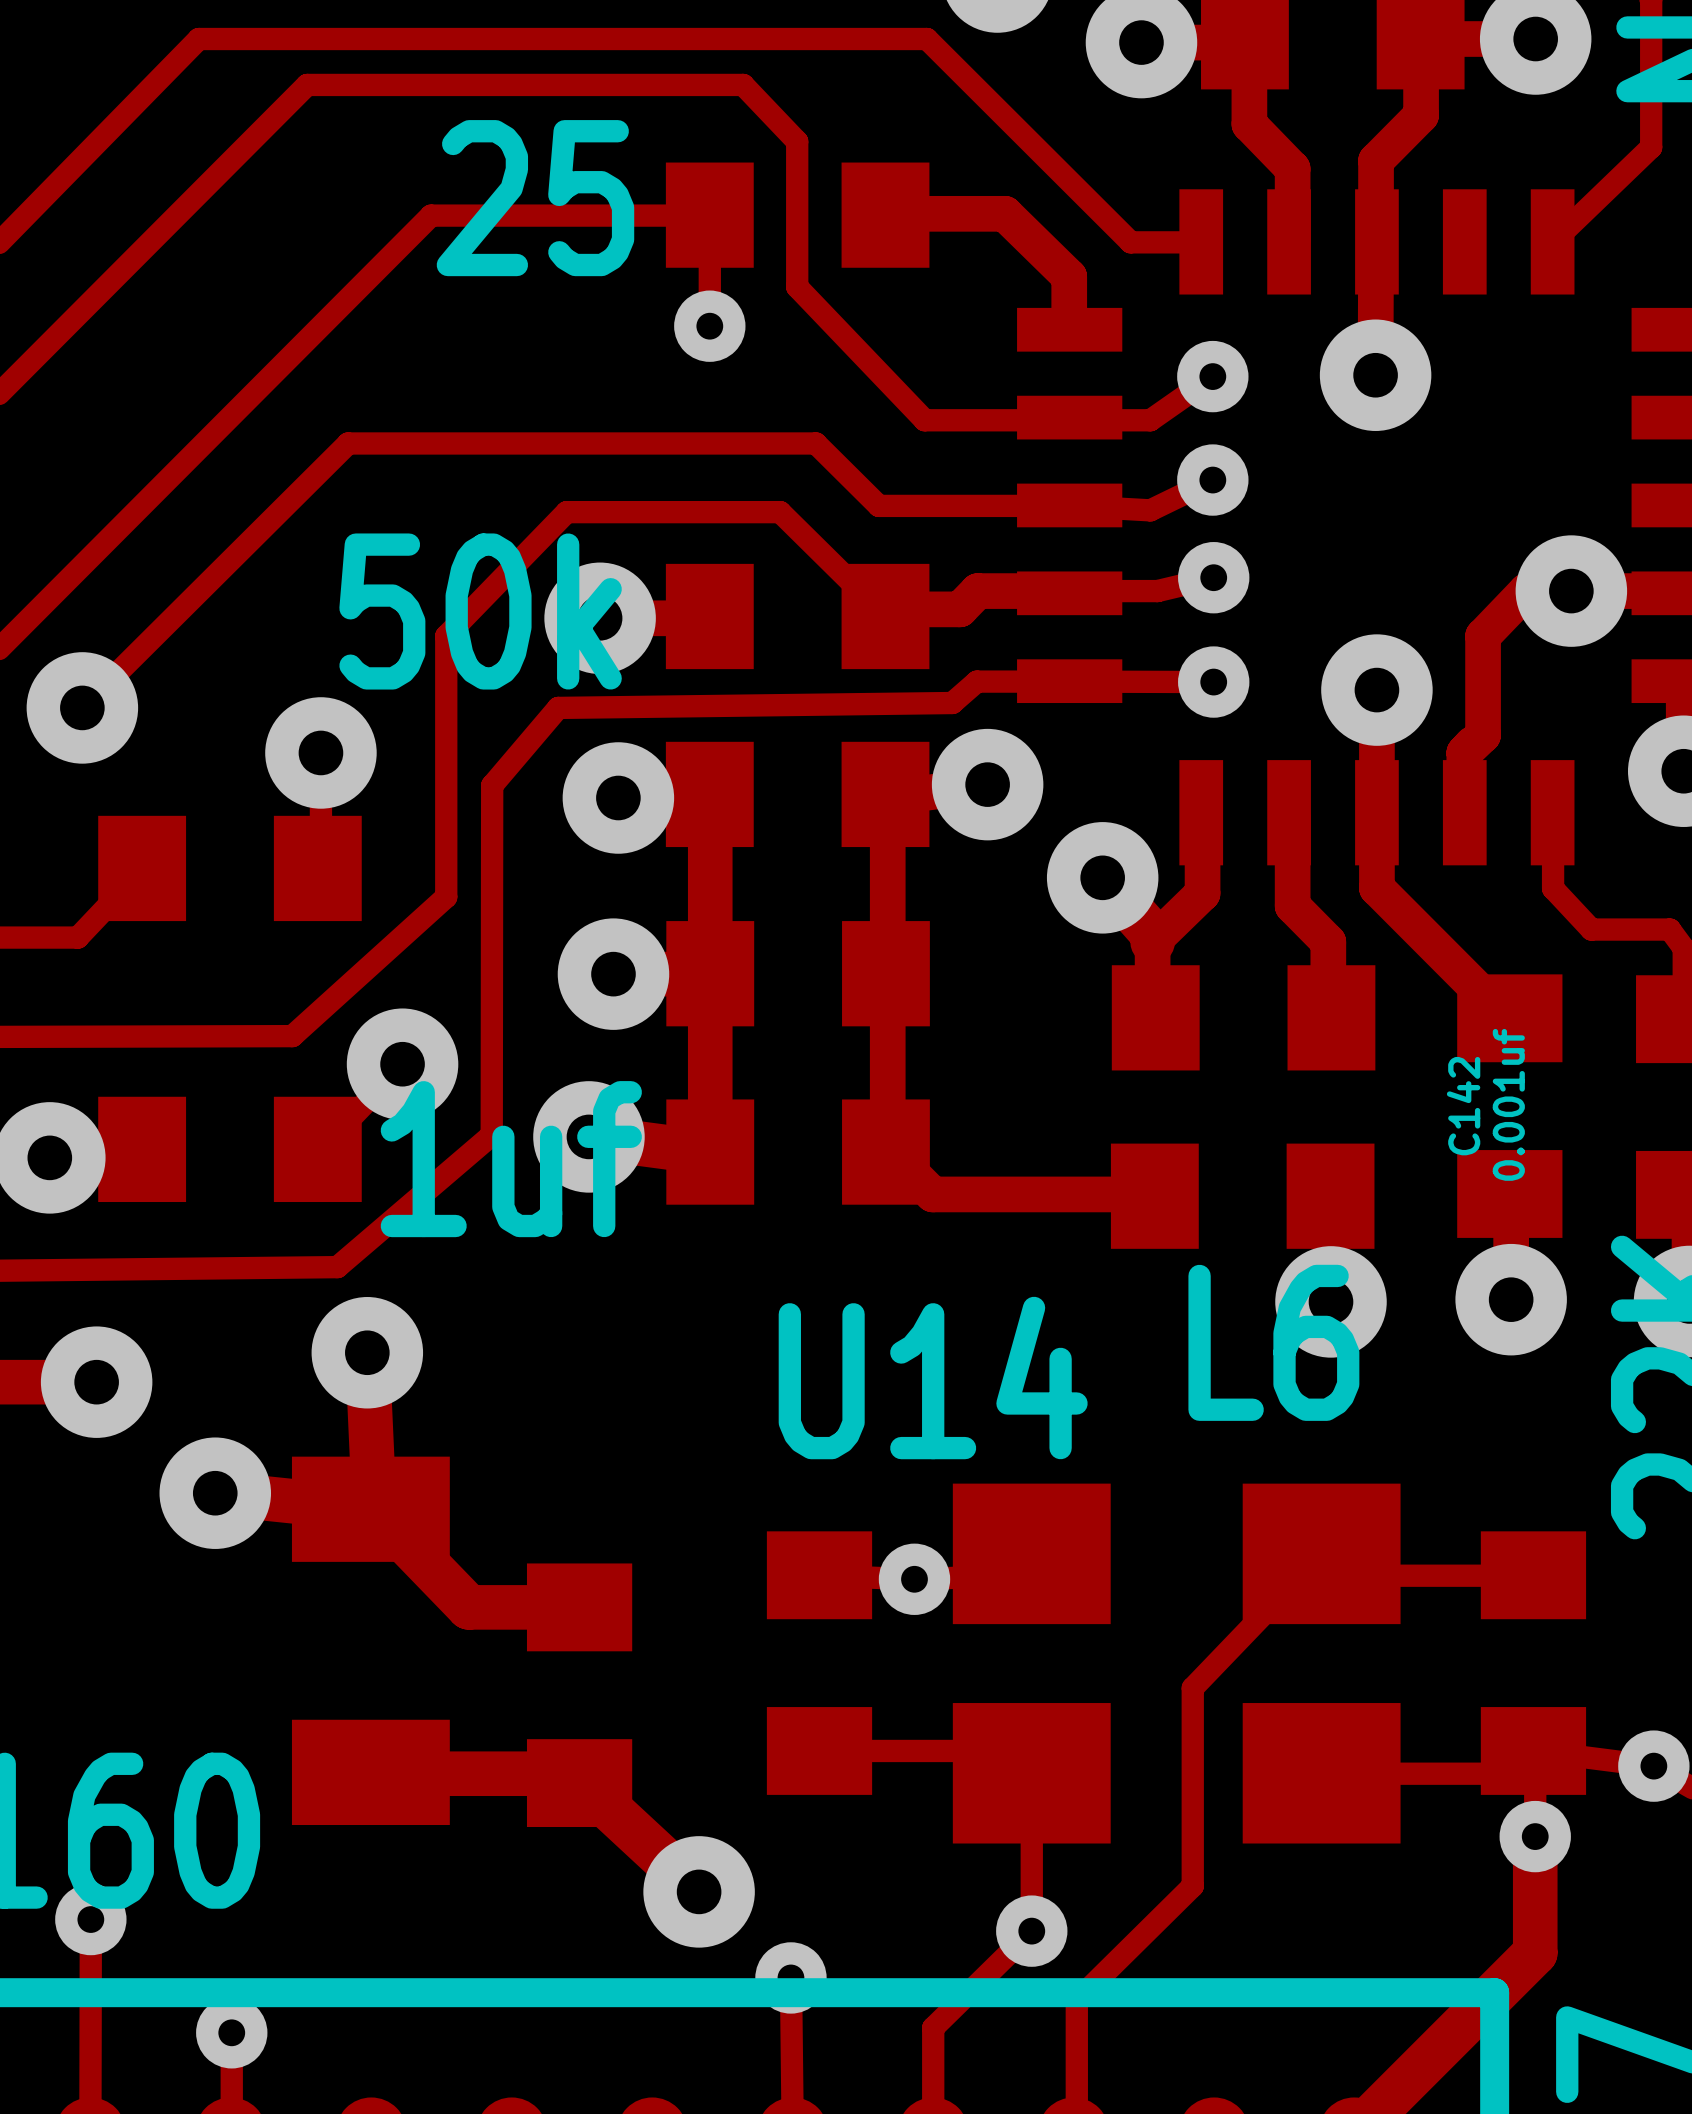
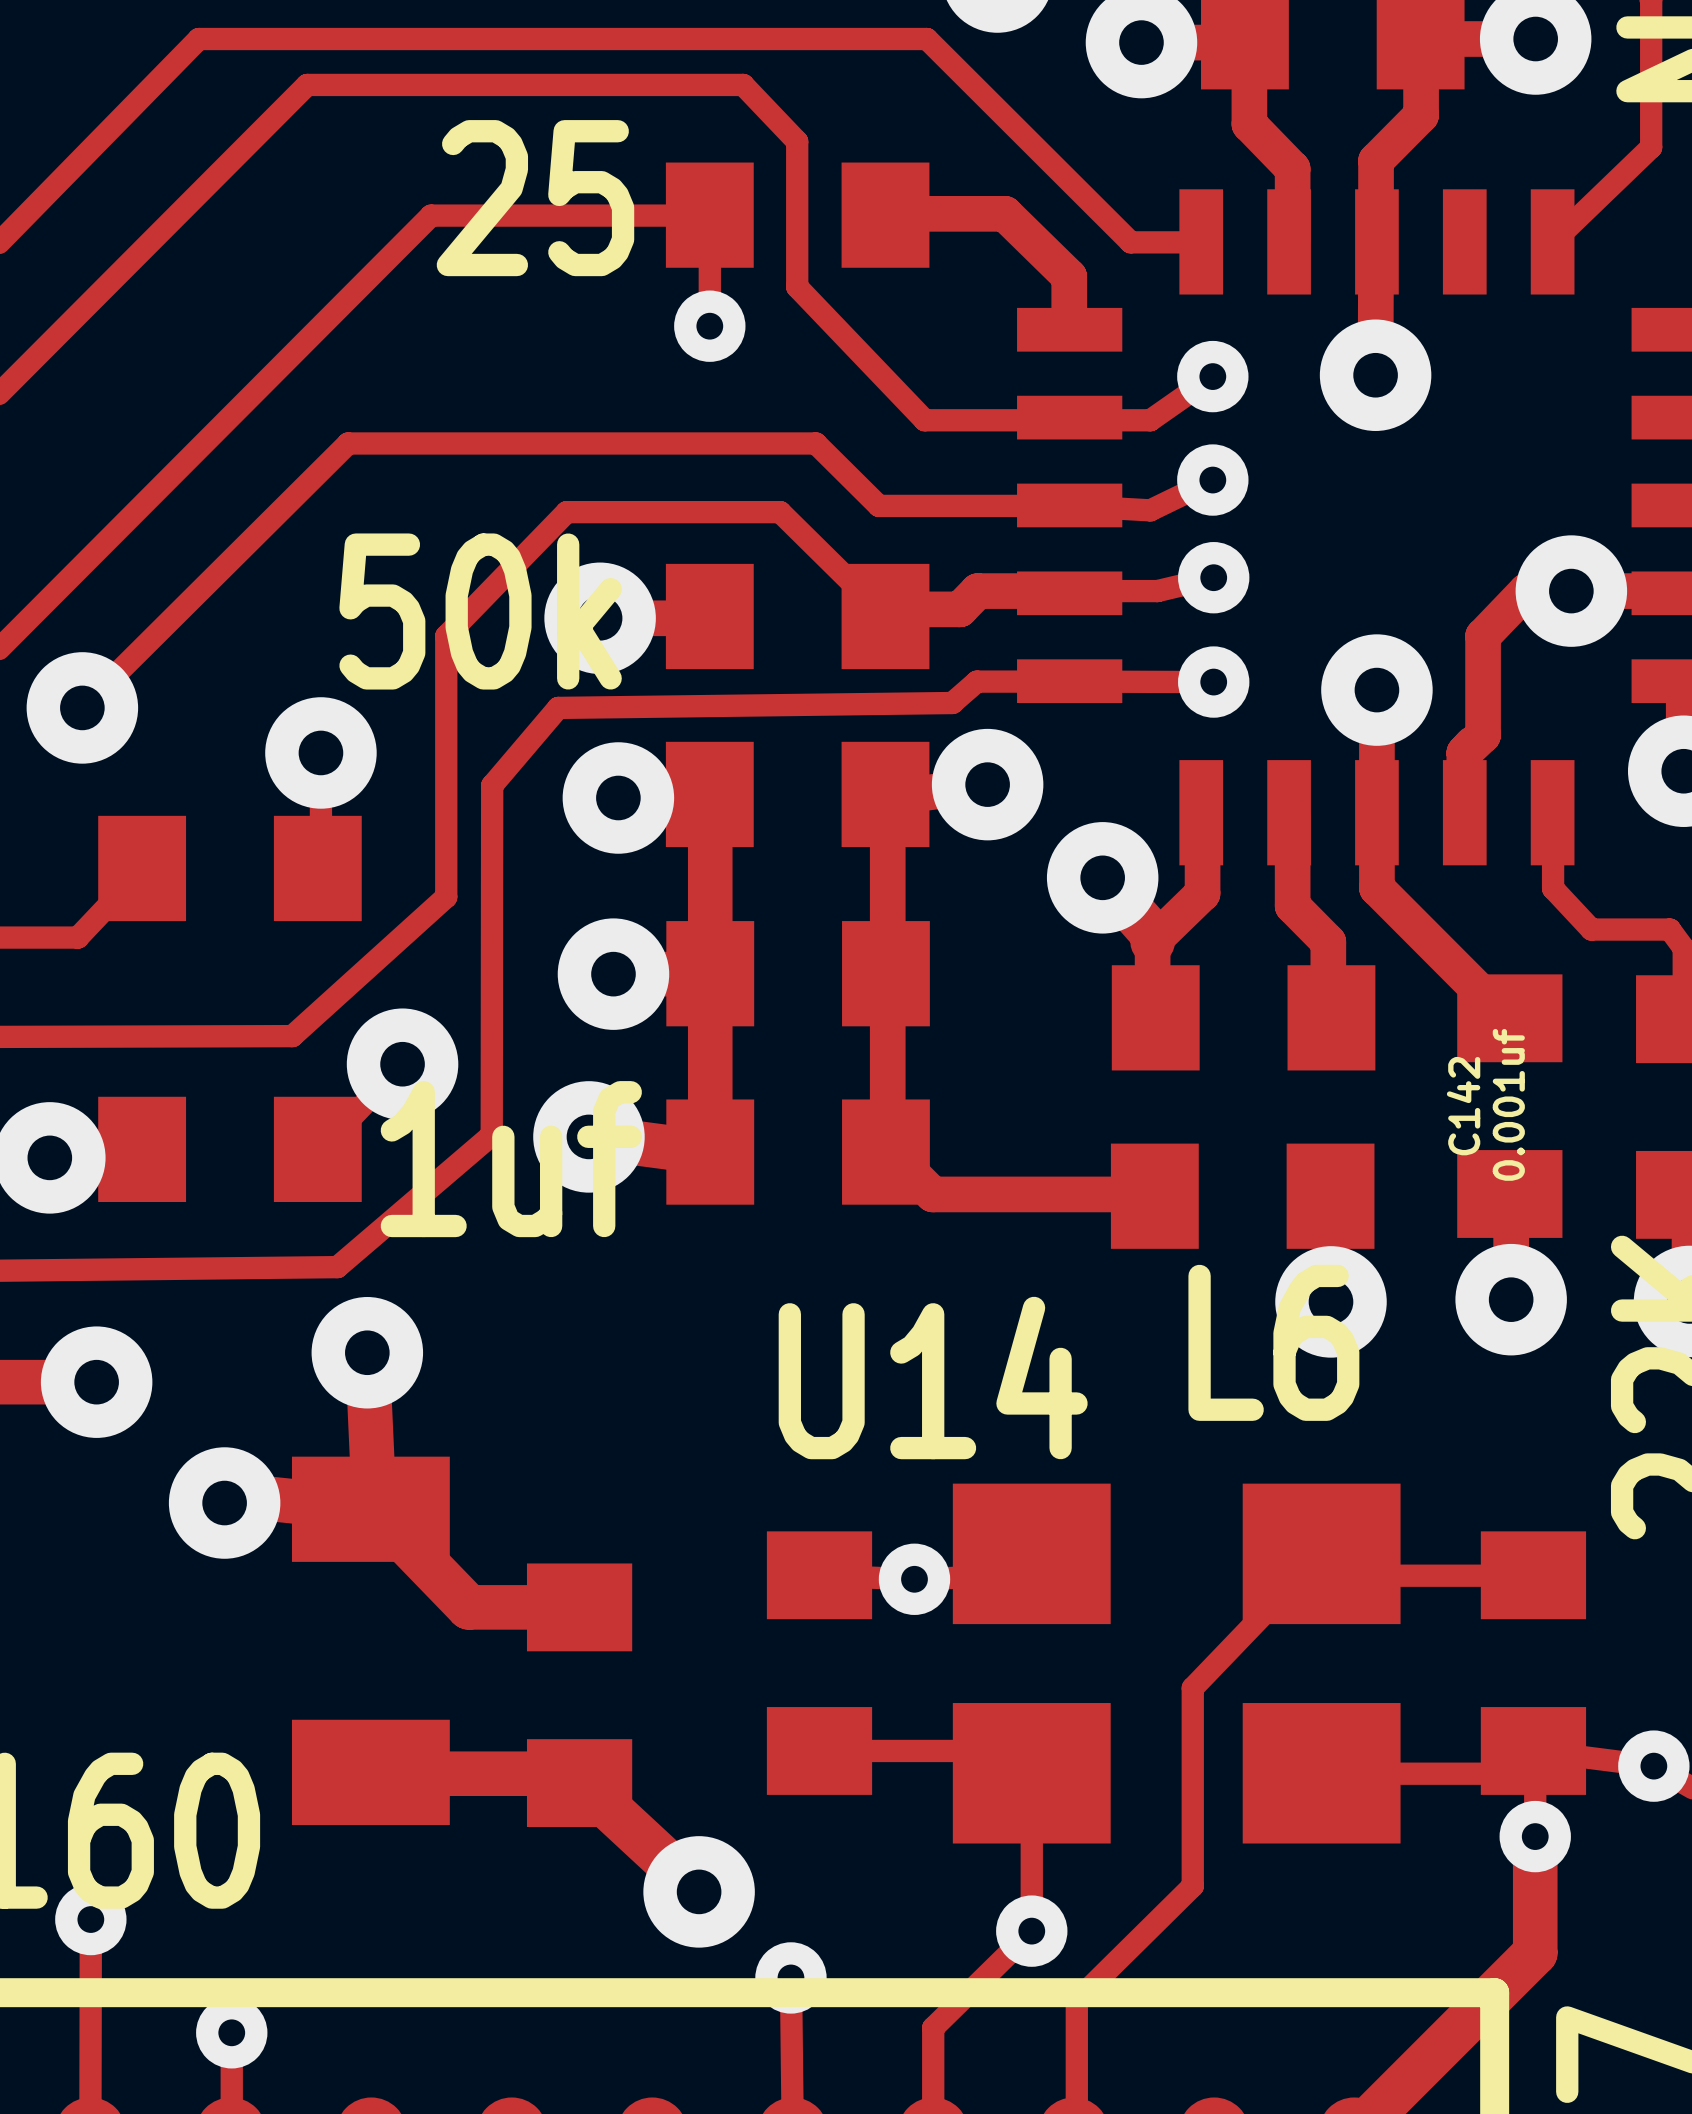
via position: (215, 1493) -> (224, 1503)

